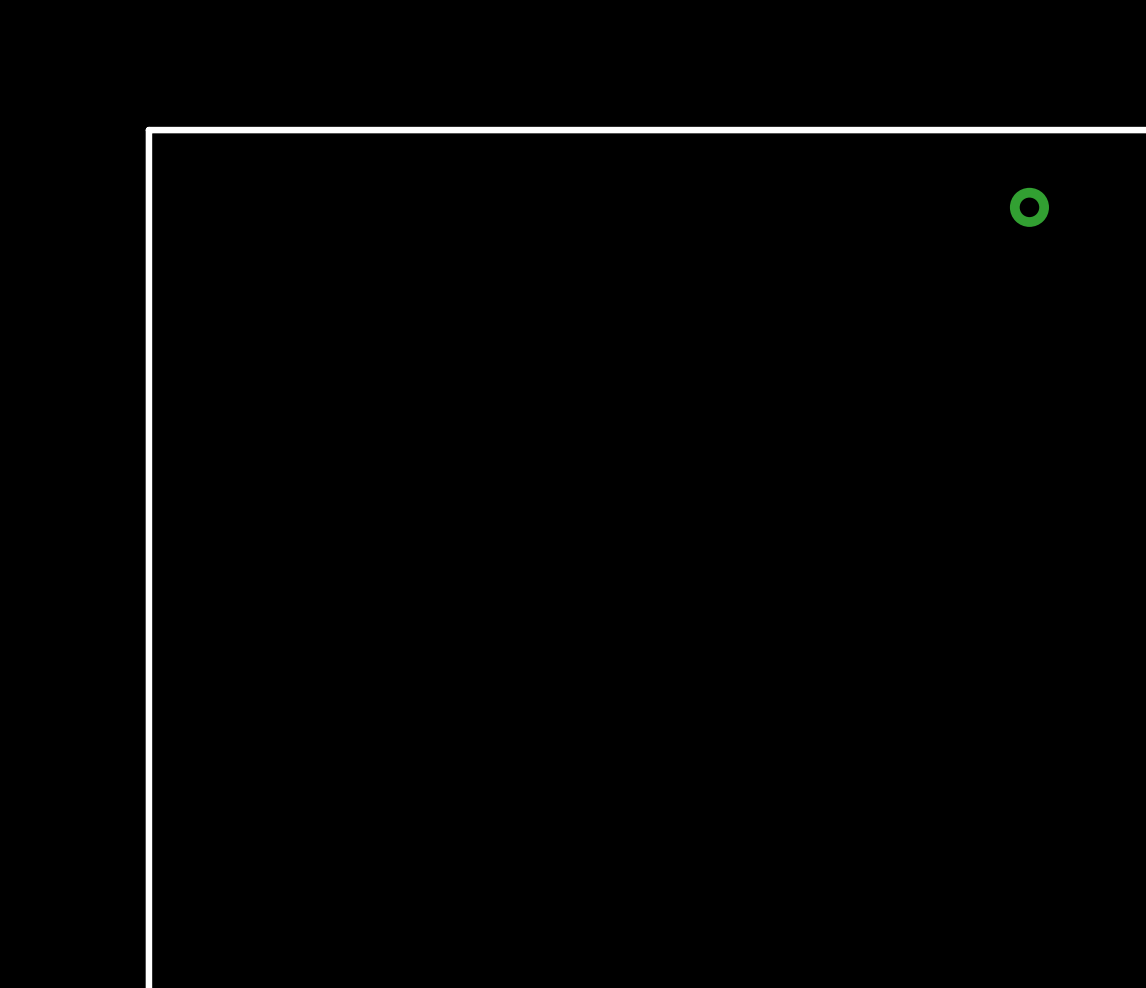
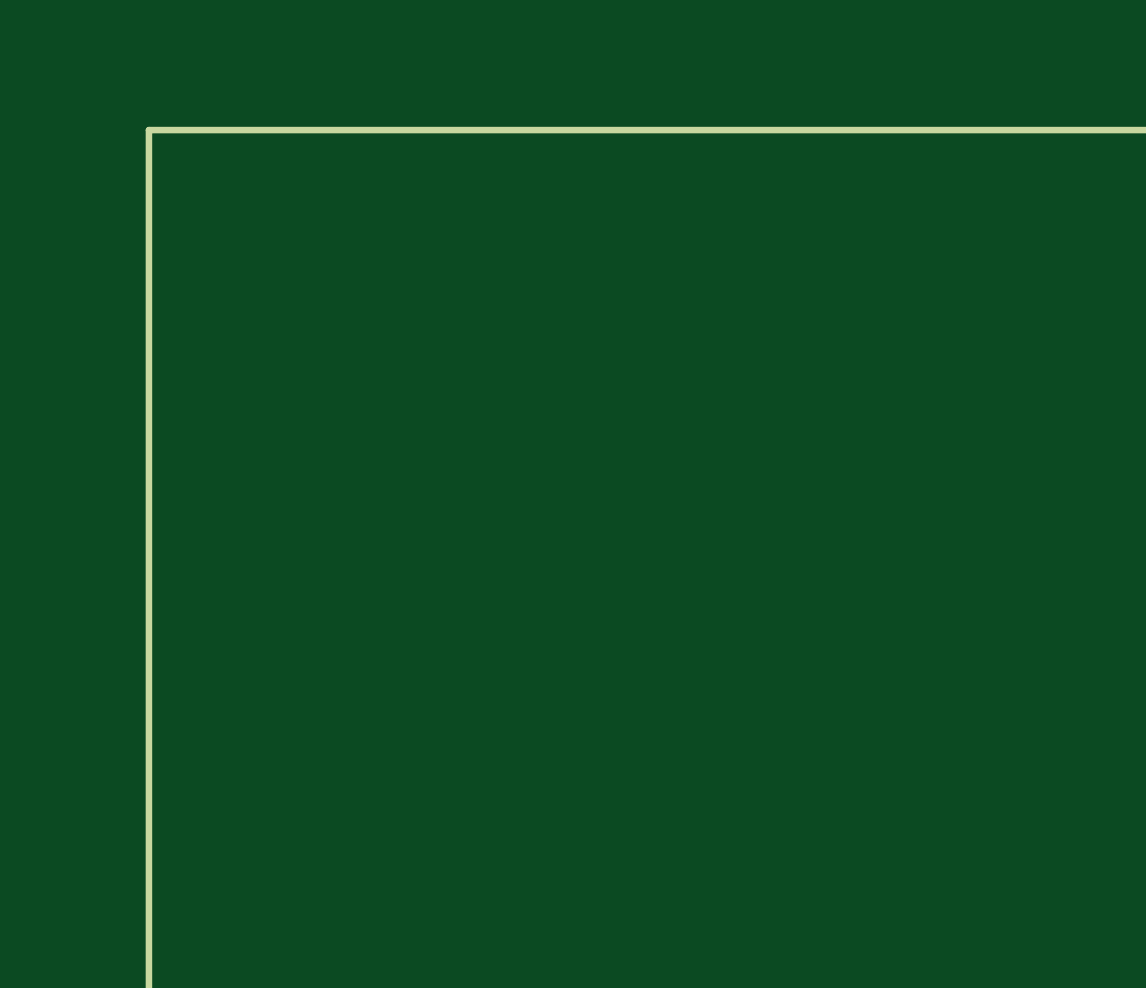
via: (1029, 207) -> none

